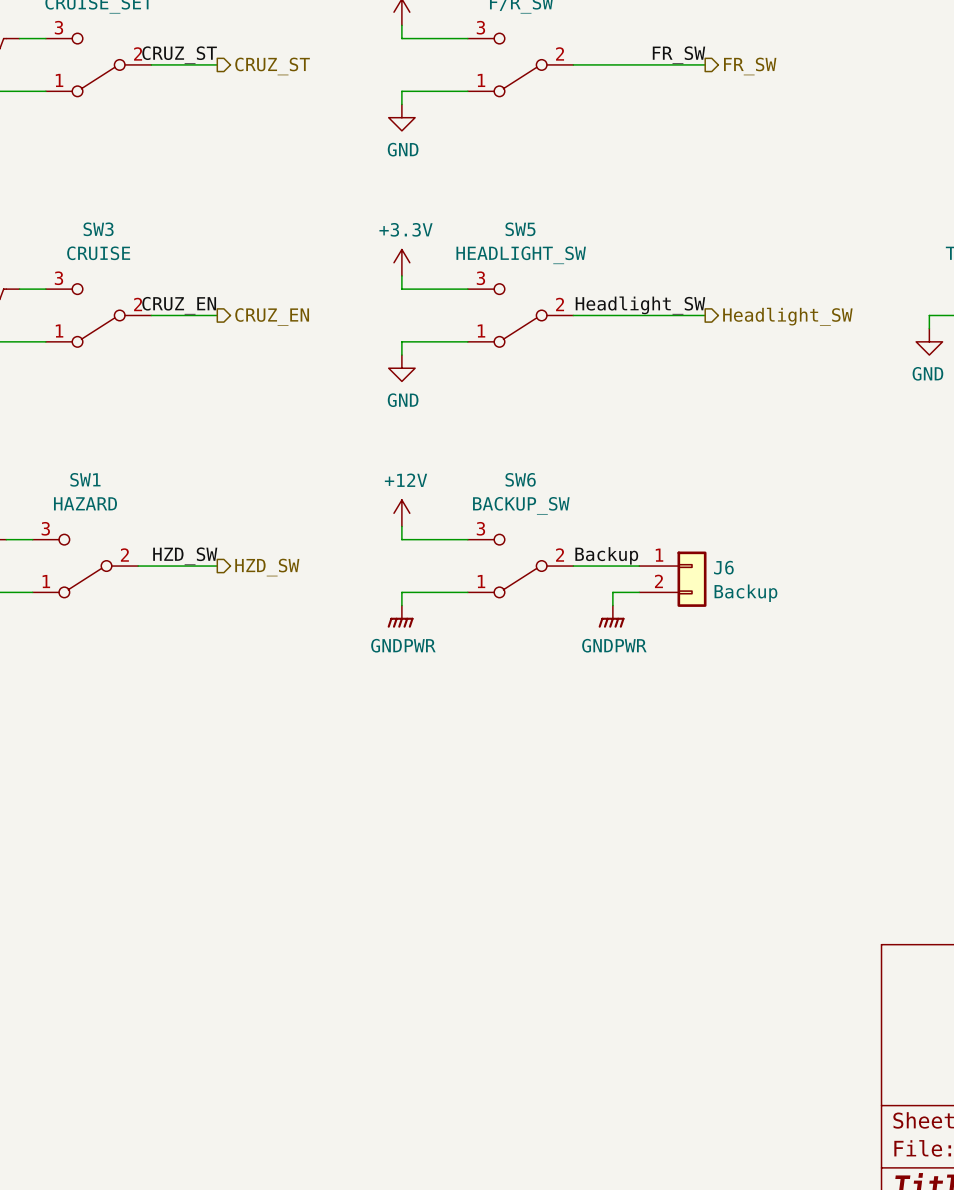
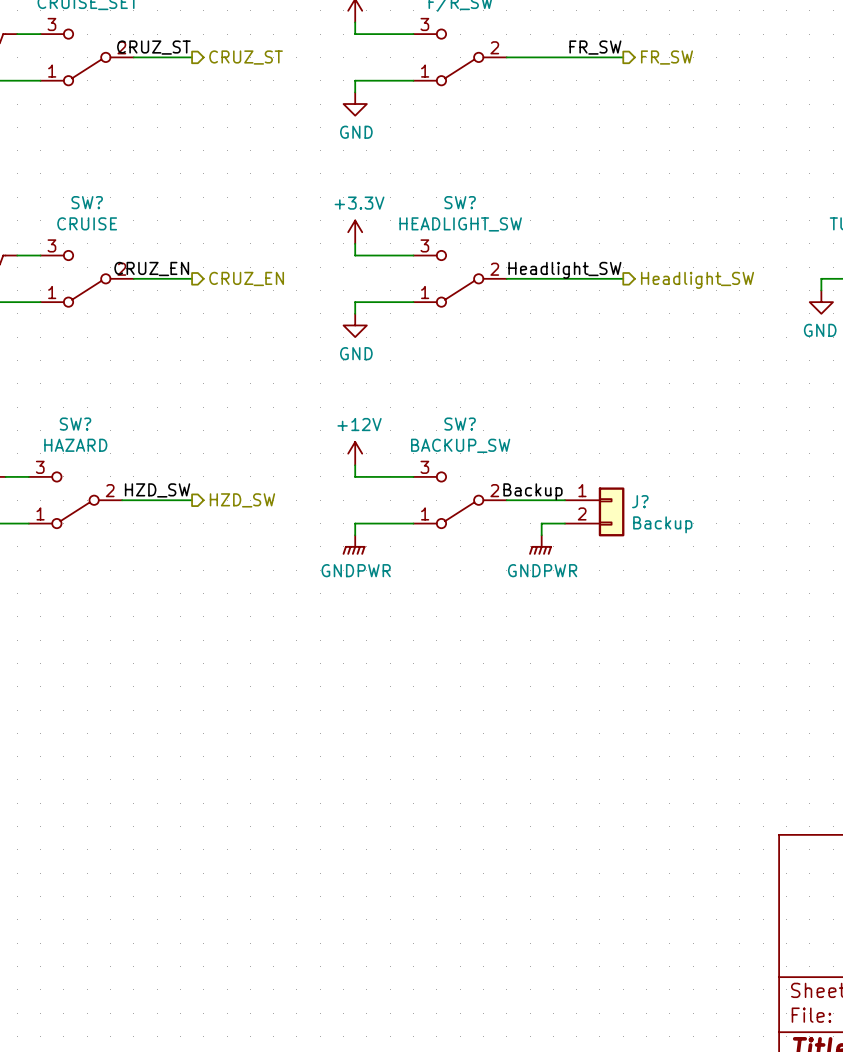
SW3 name: SW3 (98, 229) -> SW? (87, 202)
SW5 name: SW5 (520, 229) -> SW? (460, 202)
SW1 name: SW1 (85, 479) -> SW? (75, 424)
SW6 name: SW6 (520, 479) -> SW? (460, 424)
J6 name: J6 (723, 567) -> J? (640, 501)

